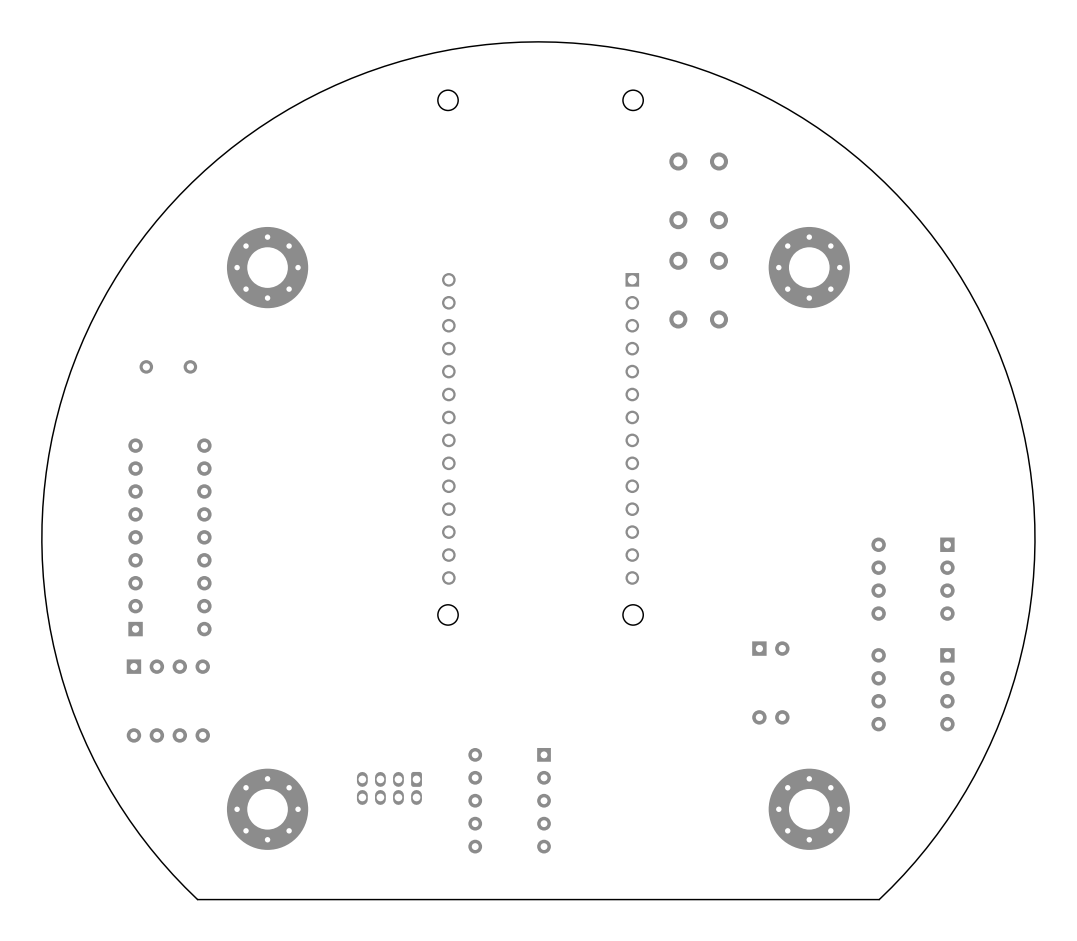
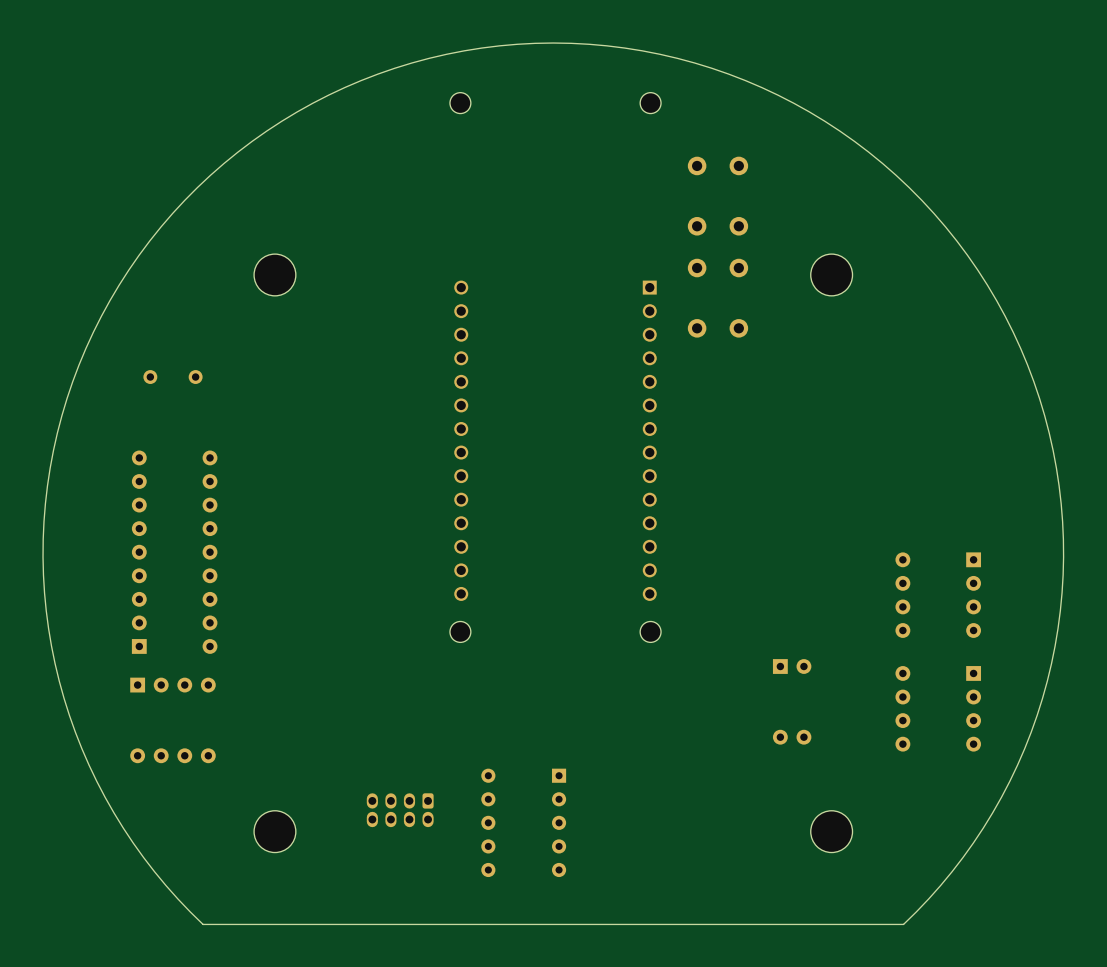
part footprint: [226, 226, 309, 309] -> [254, 254, 296, 296]
part footprint: [768, 226, 850, 309] -> [810, 254, 853, 296]
part footprint: [226, 768, 309, 850] -> [254, 810, 296, 853]
part footprint: [768, 768, 850, 850] -> [810, 810, 853, 853]

